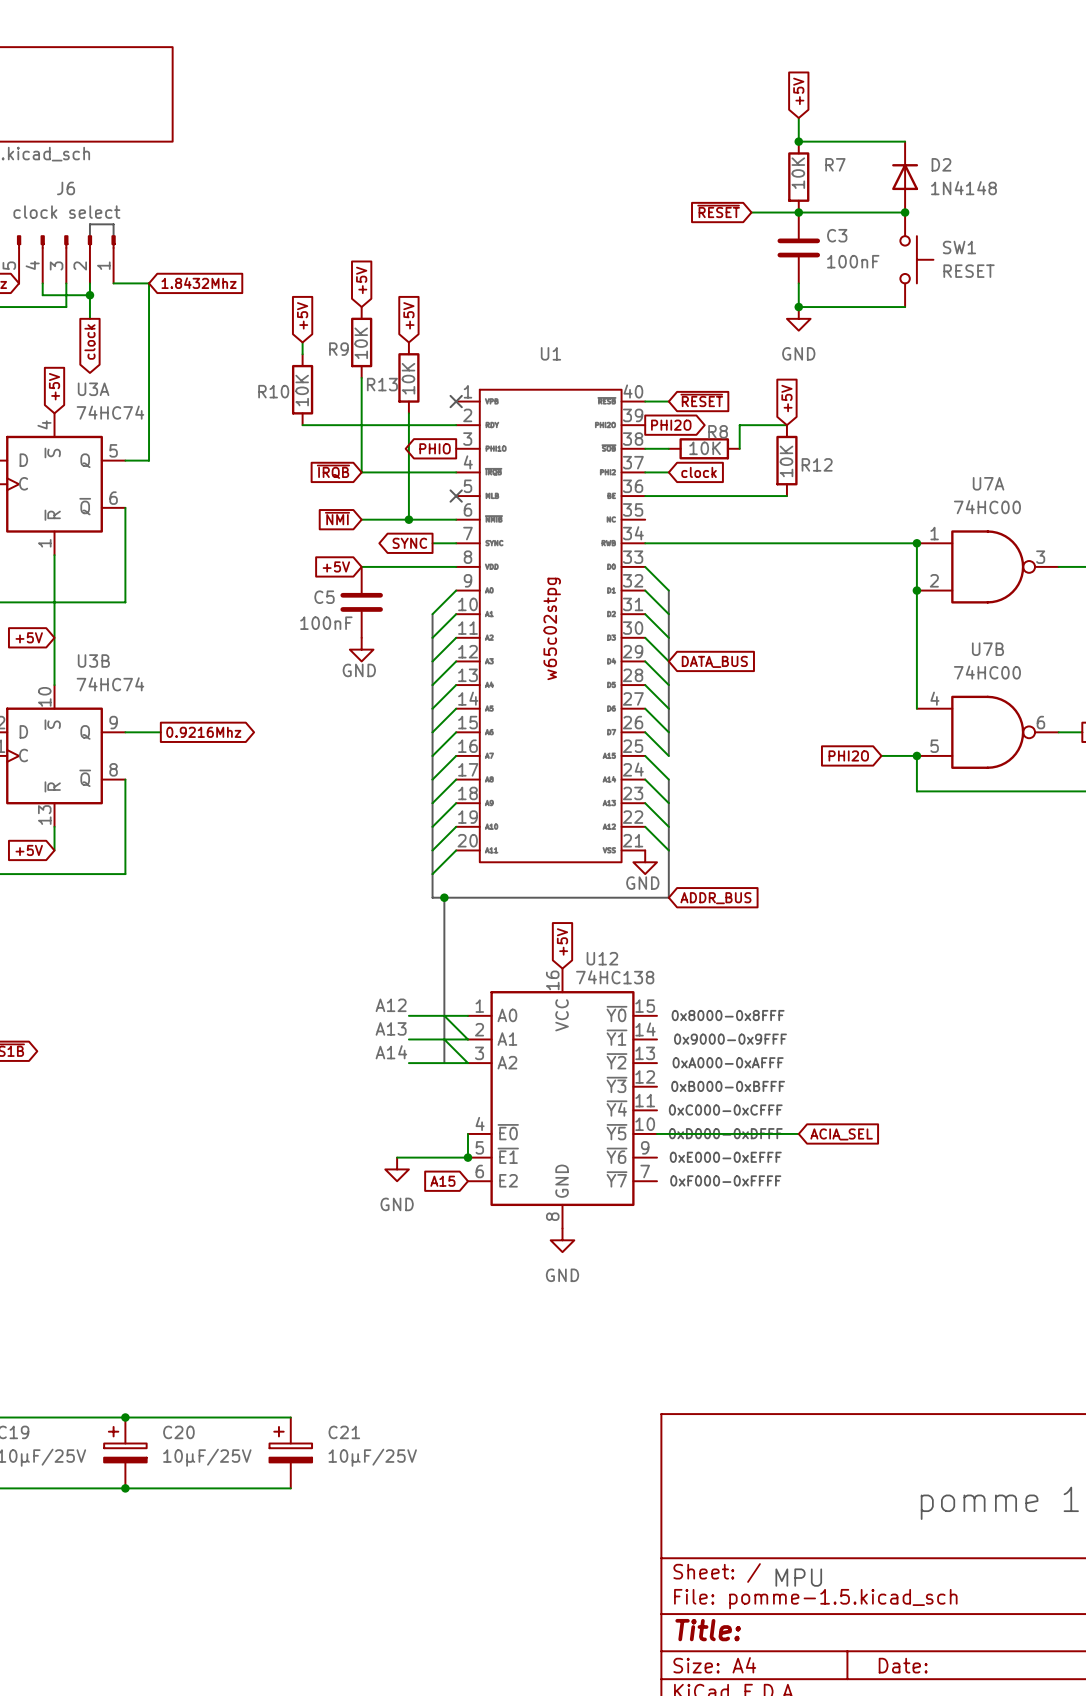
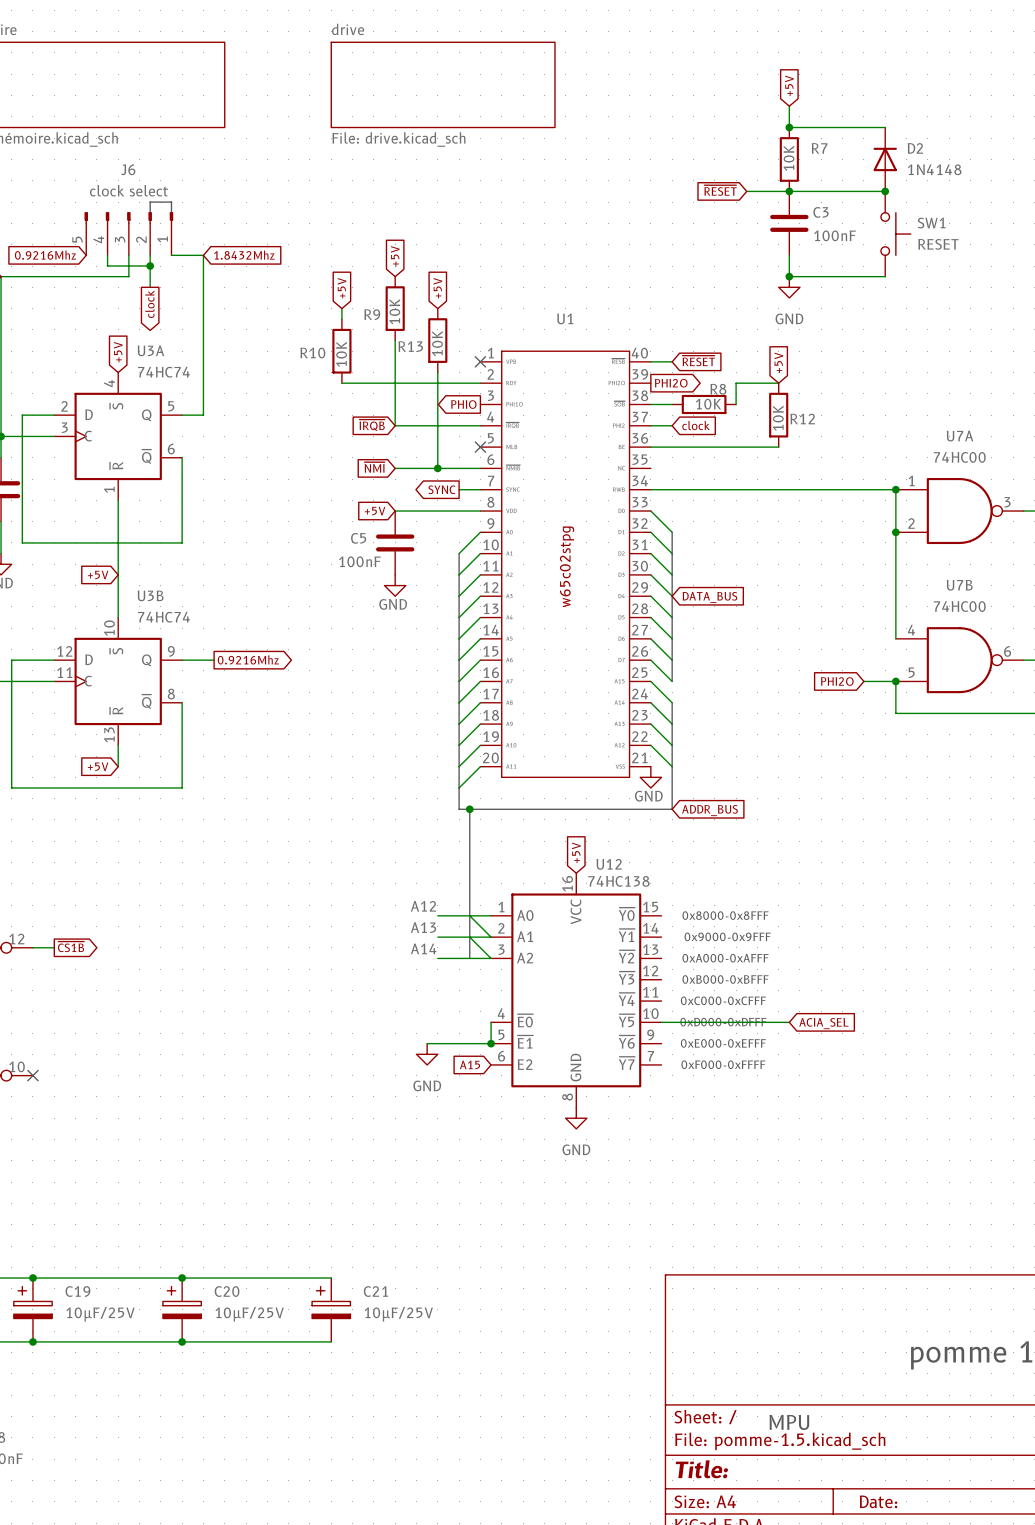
sheet drive: none -> File: drive.kicad_sch (443, 84)

